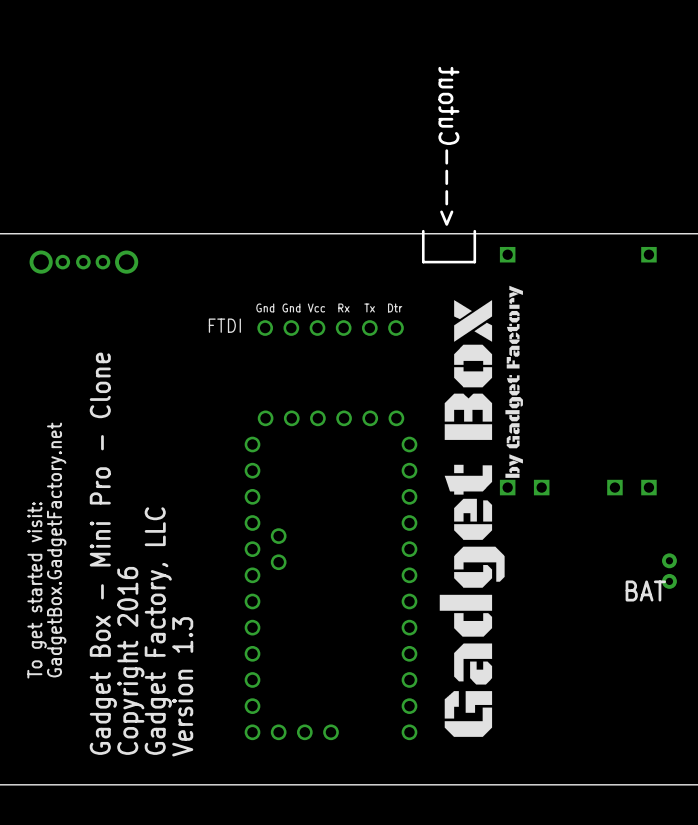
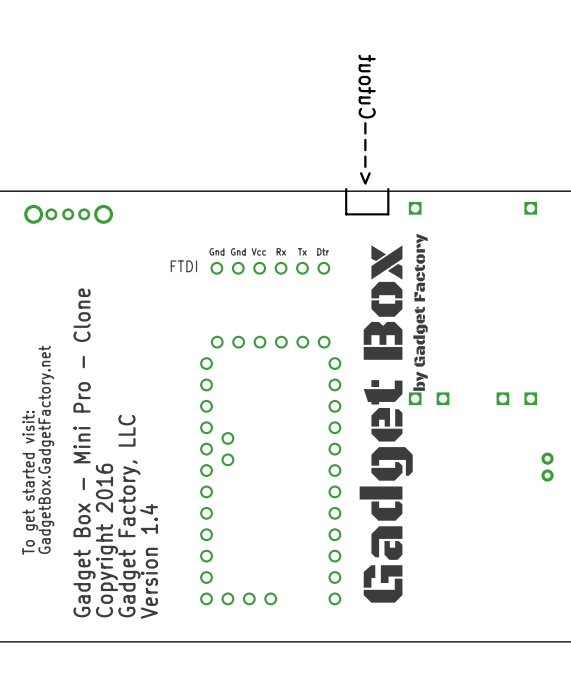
text: BAT (645, 590) -> none
text: Version 1.3 (182, 686) -> Version 1.4 (149, 561)

